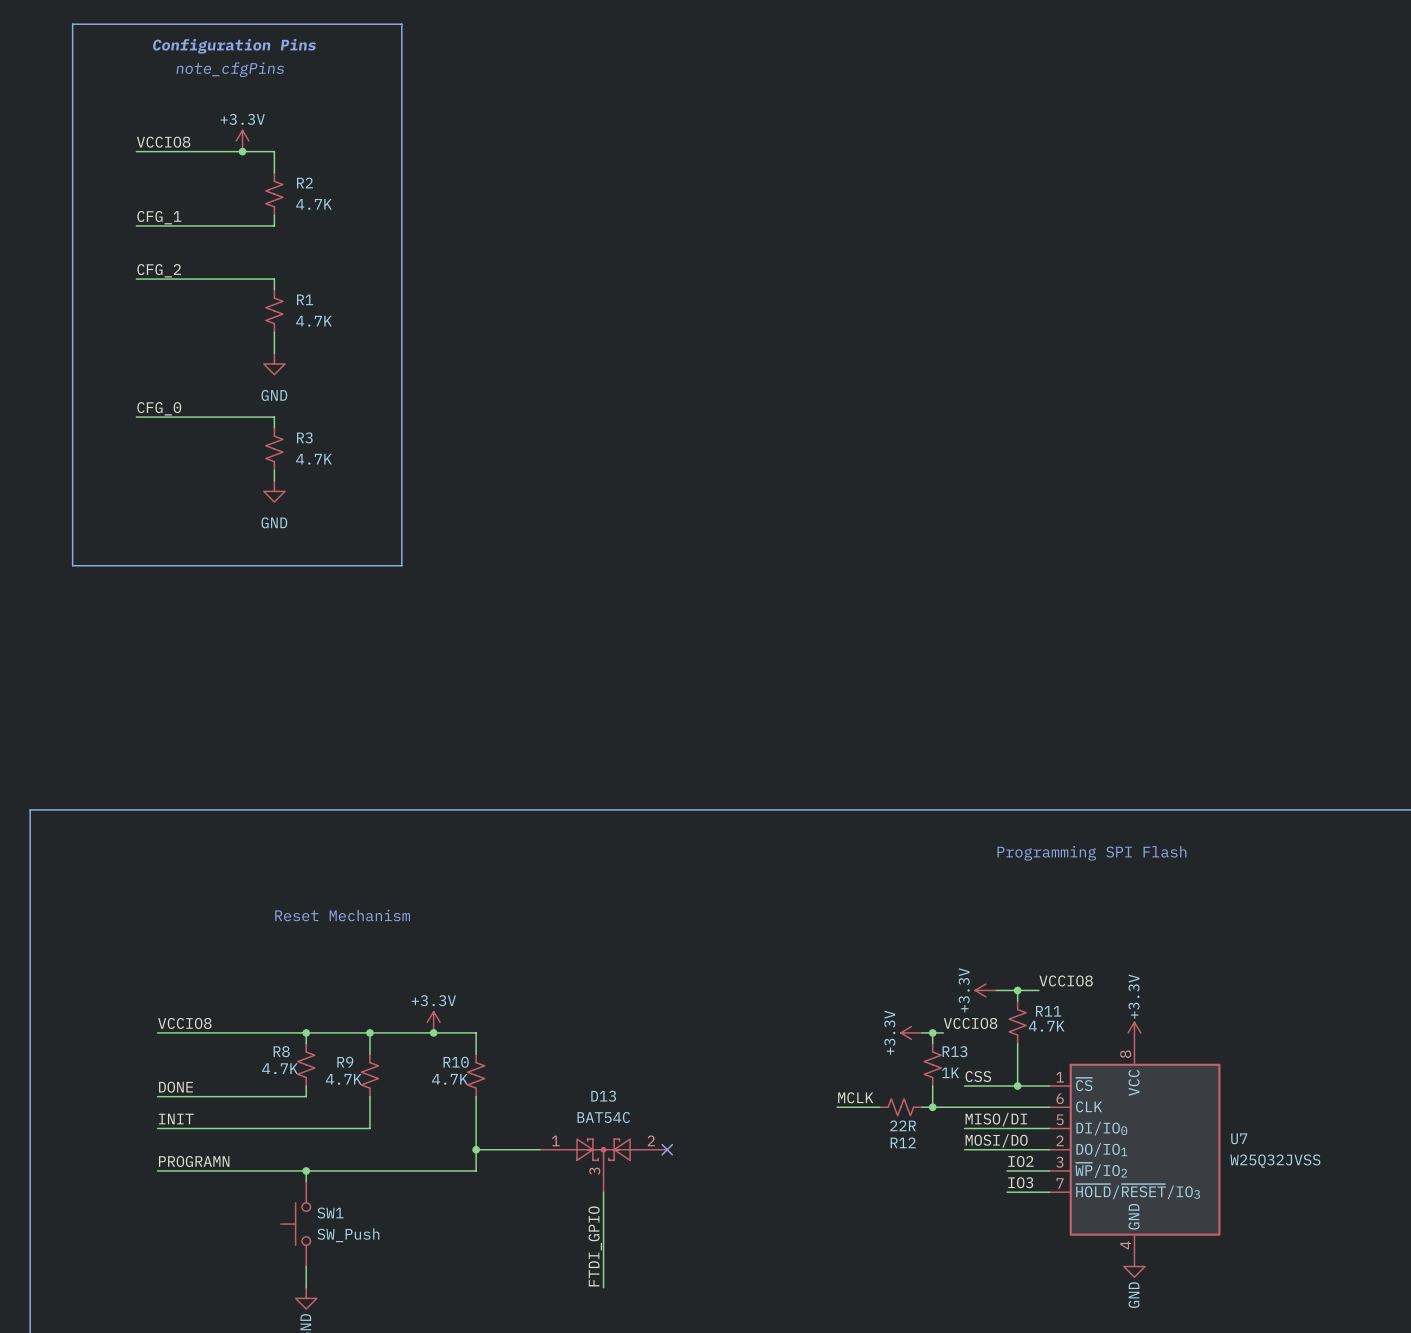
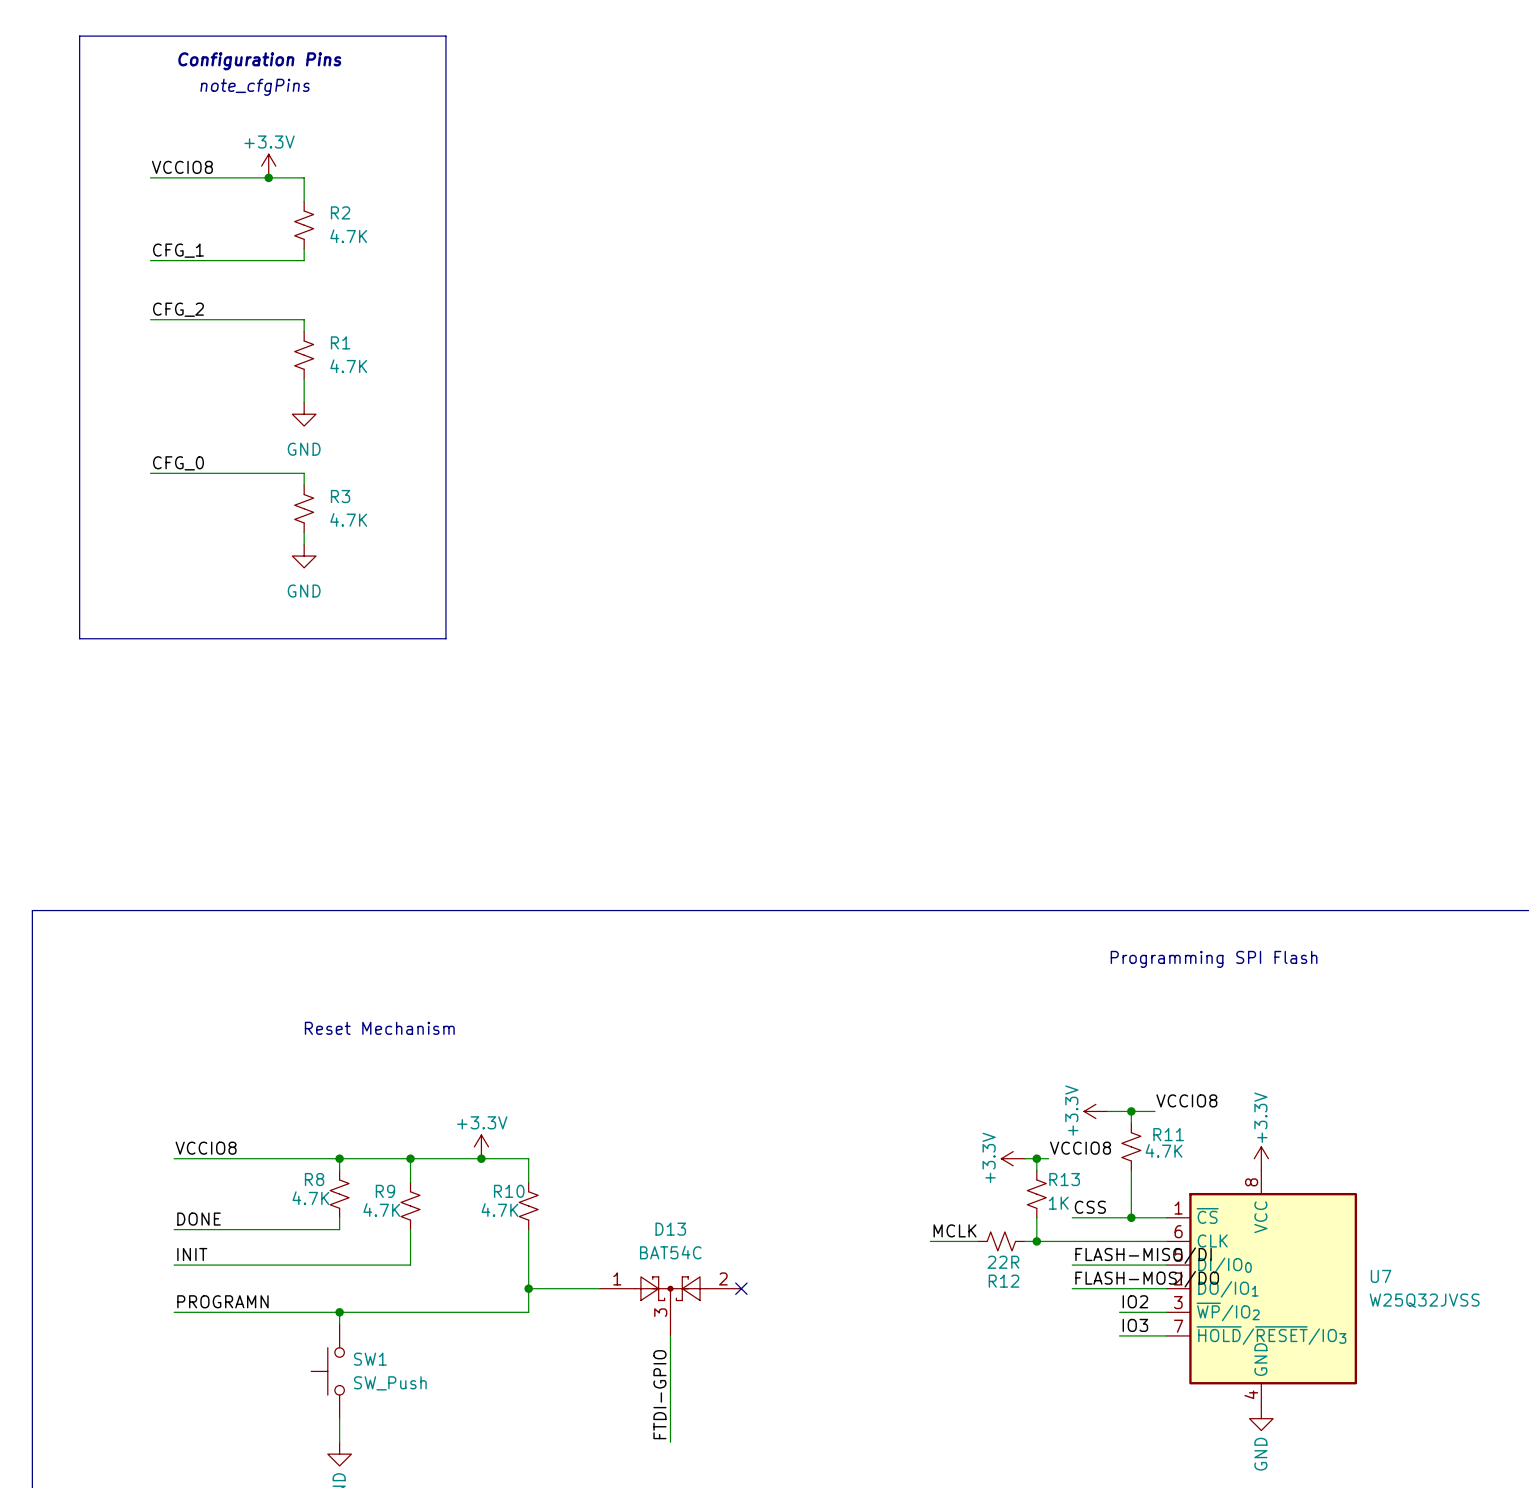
label: MISO/DI (996, 1119) -> FLASH-MISO/DI (1143, 1255)
label: MOSI/DO (996, 1140) -> FLASH-MOSI/DO (1147, 1279)
label: FTDI_GPIO (595, 1246) -> FTDI-GPIO (659, 1394)

